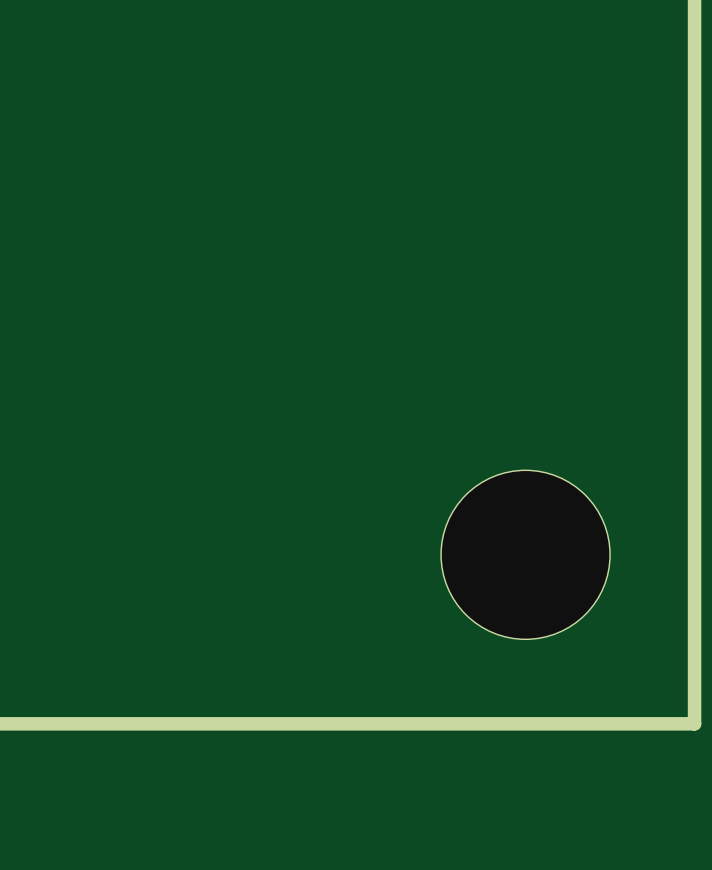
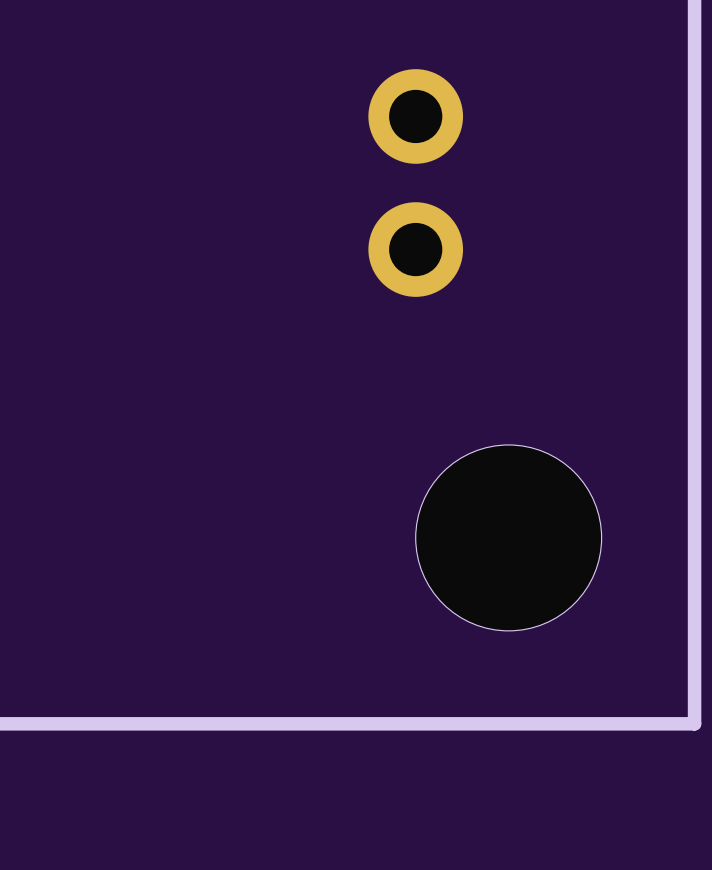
part: none -> (415, 183)
hole size: [441, 470, 611, 640] -> [415, 444, 602, 631]

